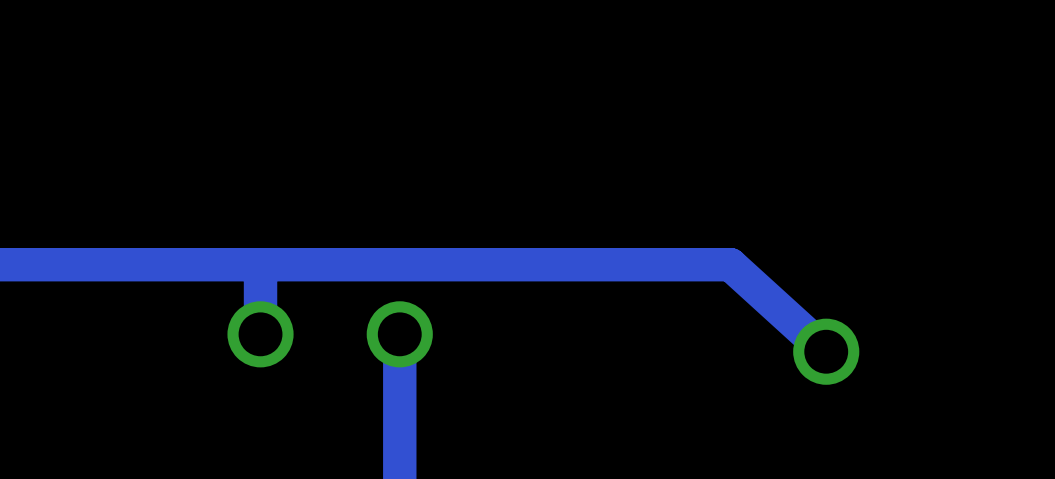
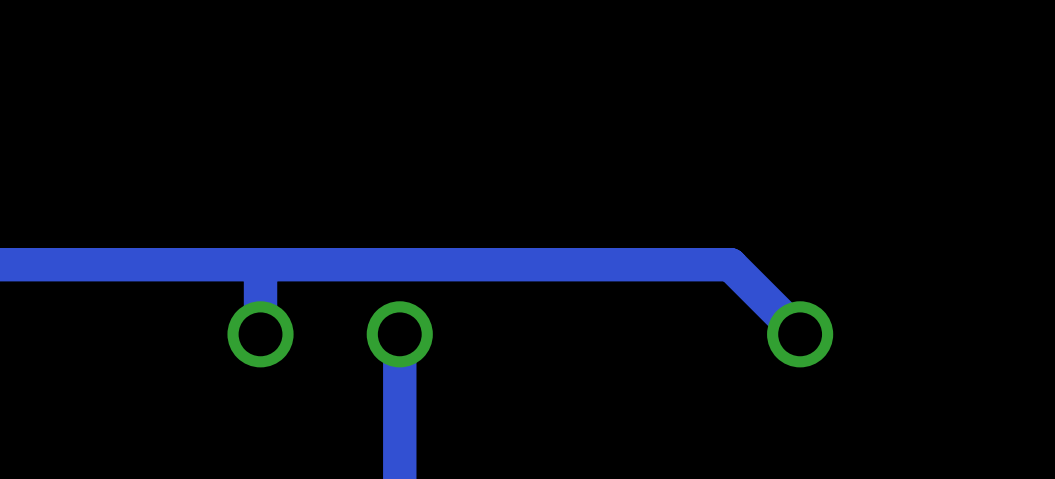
track: (730, 264) (826, 351) -> (730, 264) (800, 334)
via position: (826, 351) -> (800, 334)

